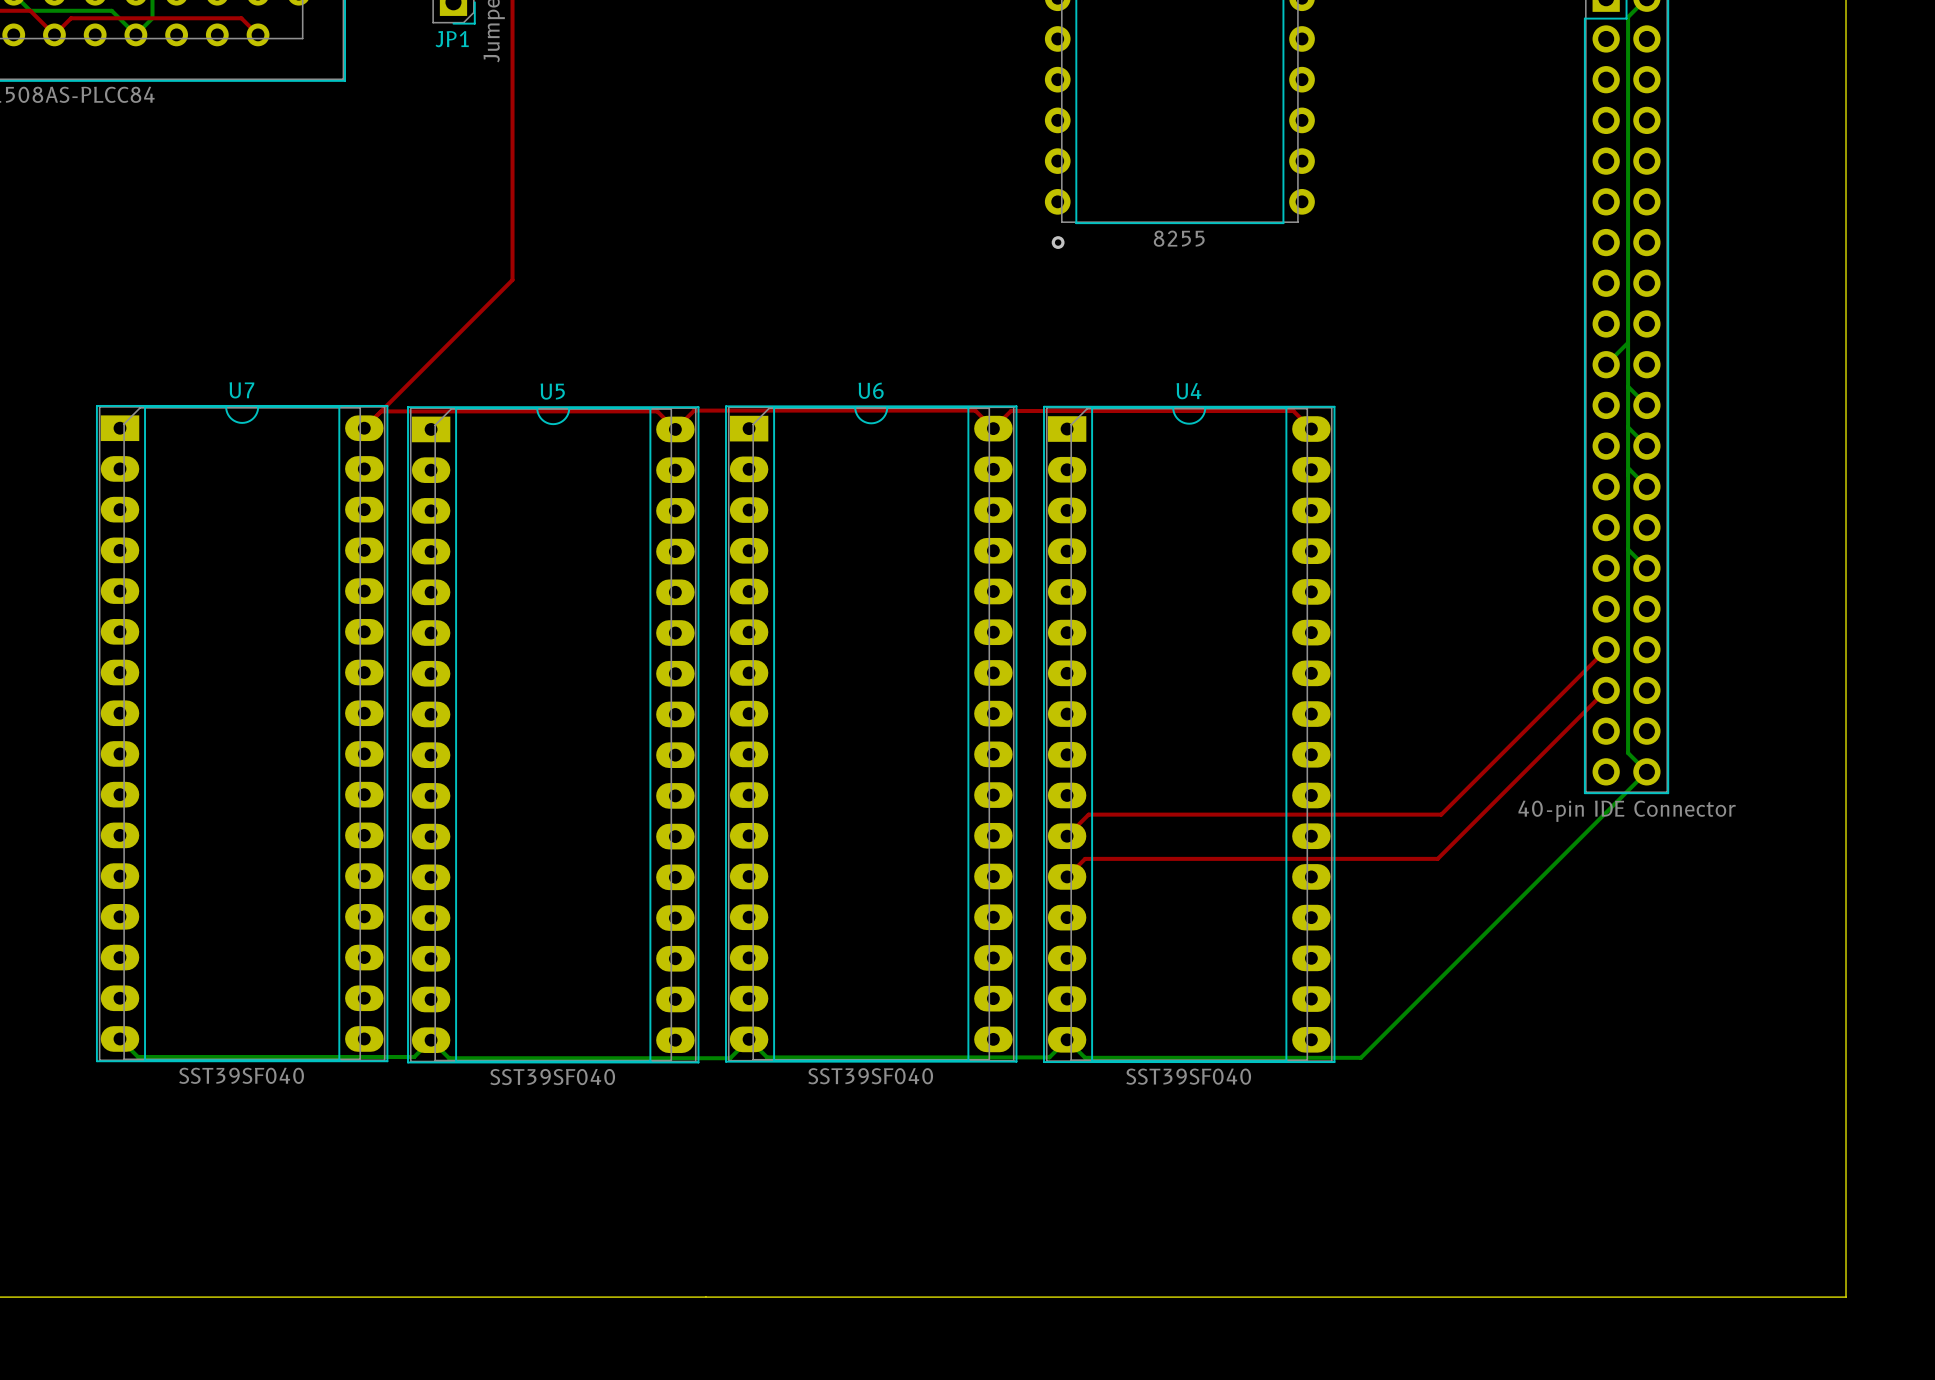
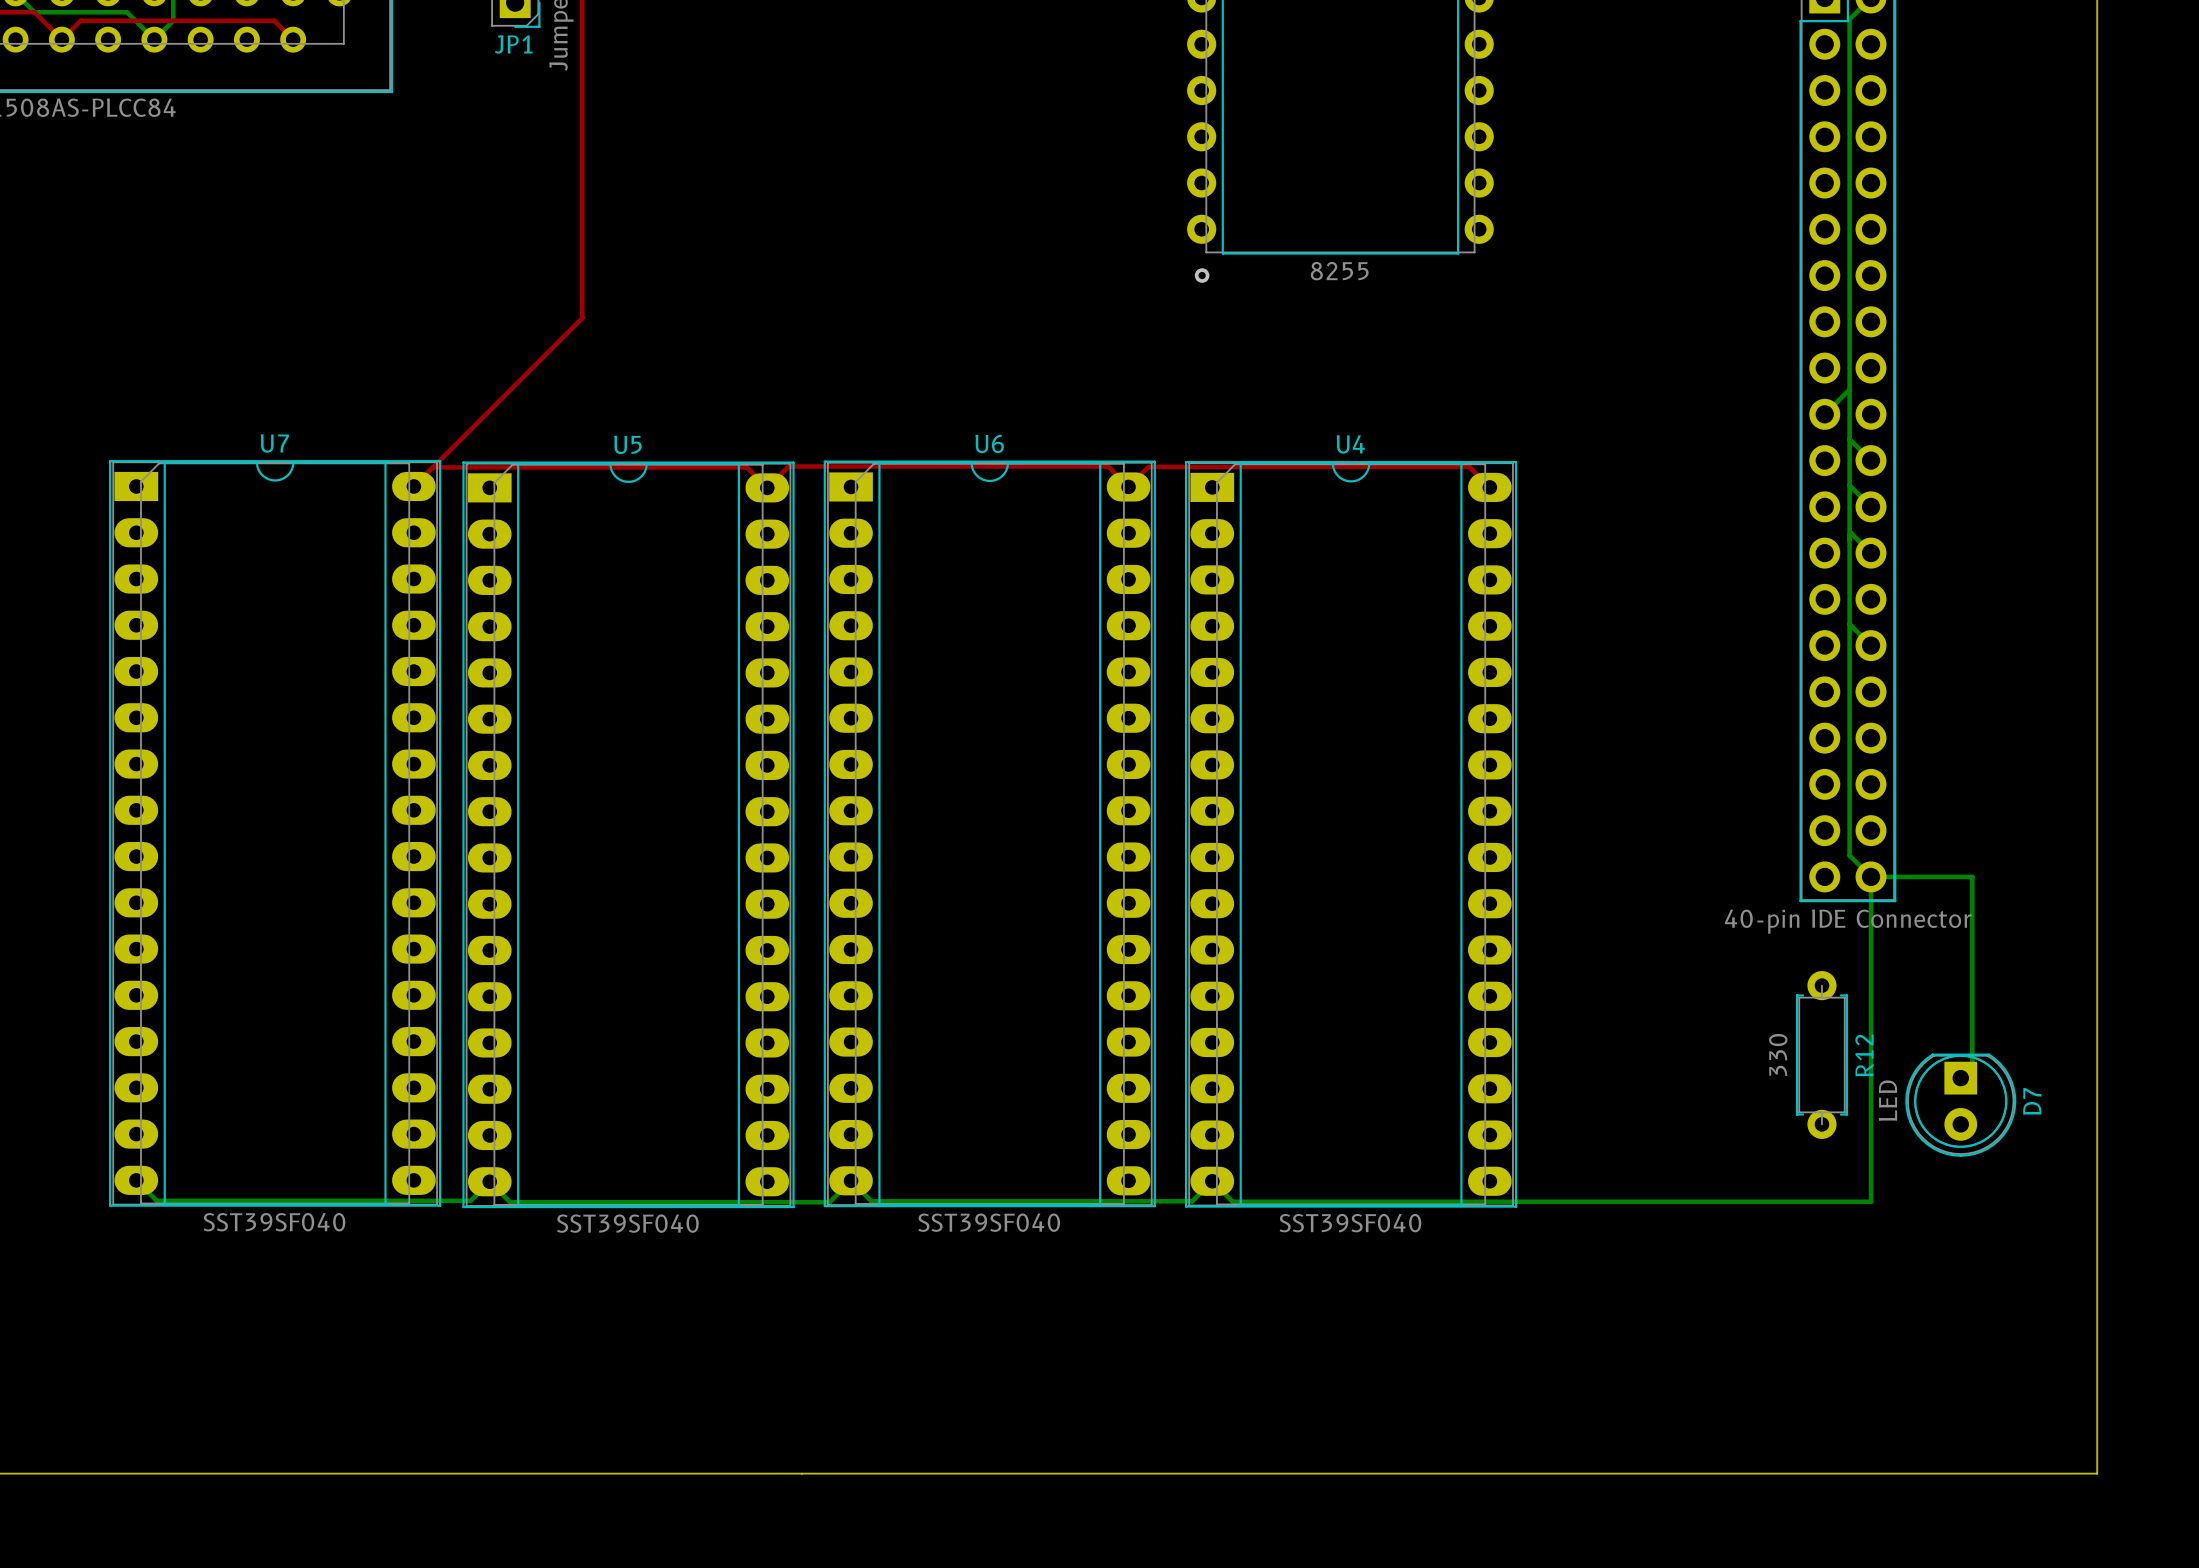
top track: (1606, 649) (1441, 814) (1088, 814) (1067, 836) -> none
top track: (1606, 690) (1437, 858) (1085, 858) (1067, 876) -> none
bottom track: (1646, 771) (1360, 1057) -> (1972, 1066) (1972, 876) (1871, 876) (1871, 1201) (1546, 1201)
R12: none -> 330 (1821, 1055)
D7: none -> LED (1960, 1105)

